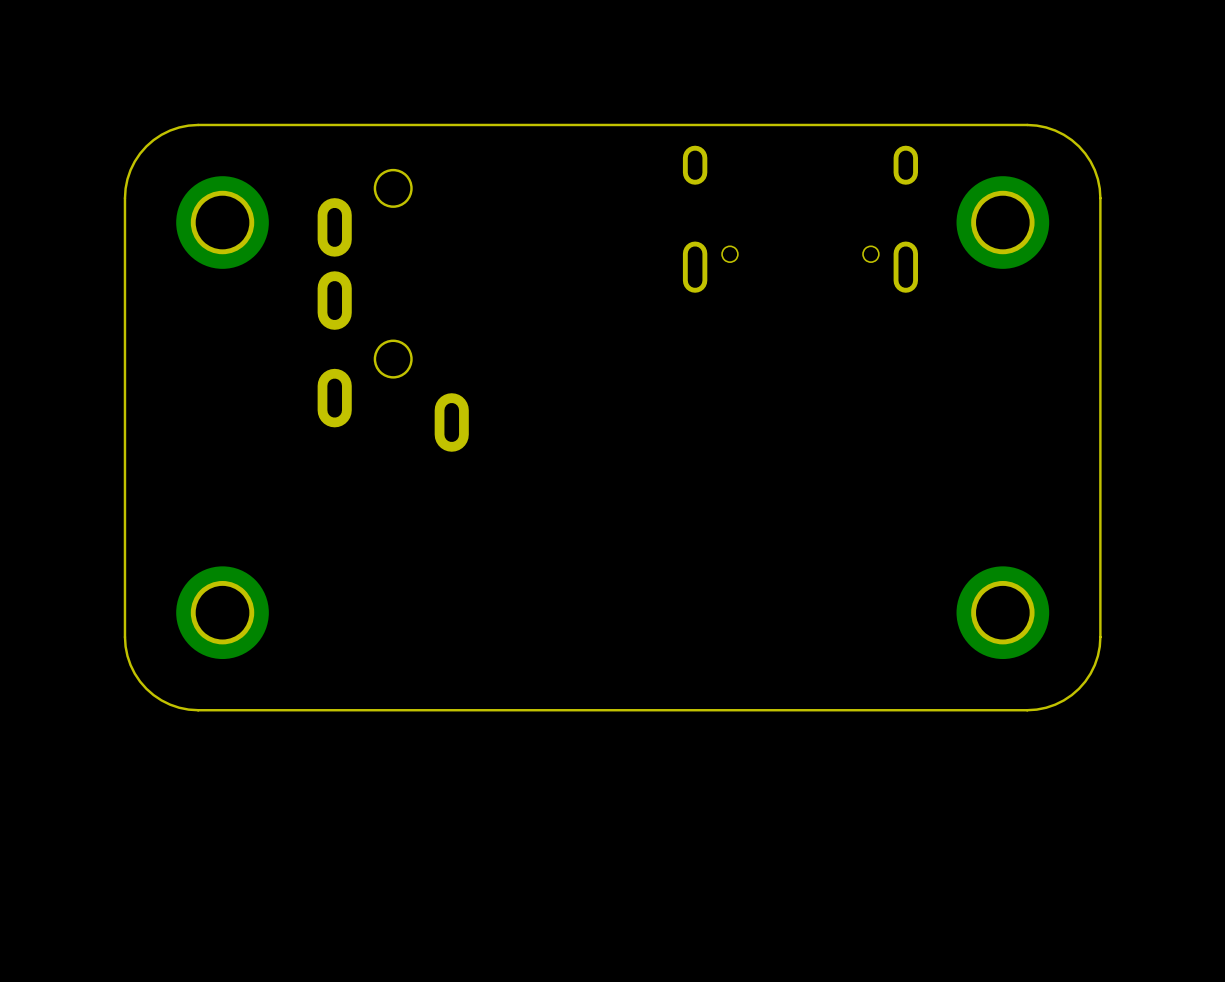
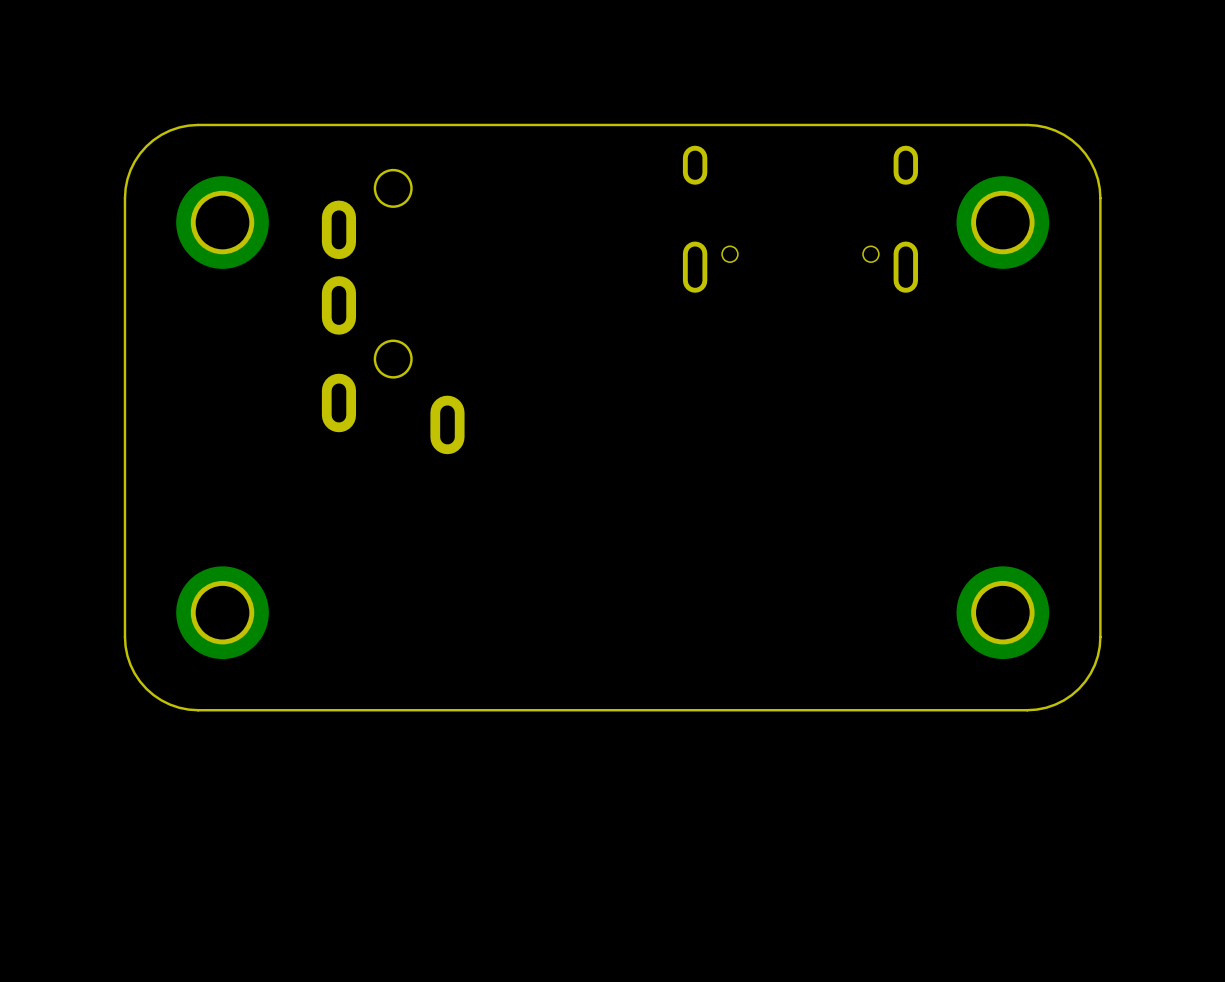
part footprint: [317, 168, 469, 452] -> [321, 168, 465, 455]

